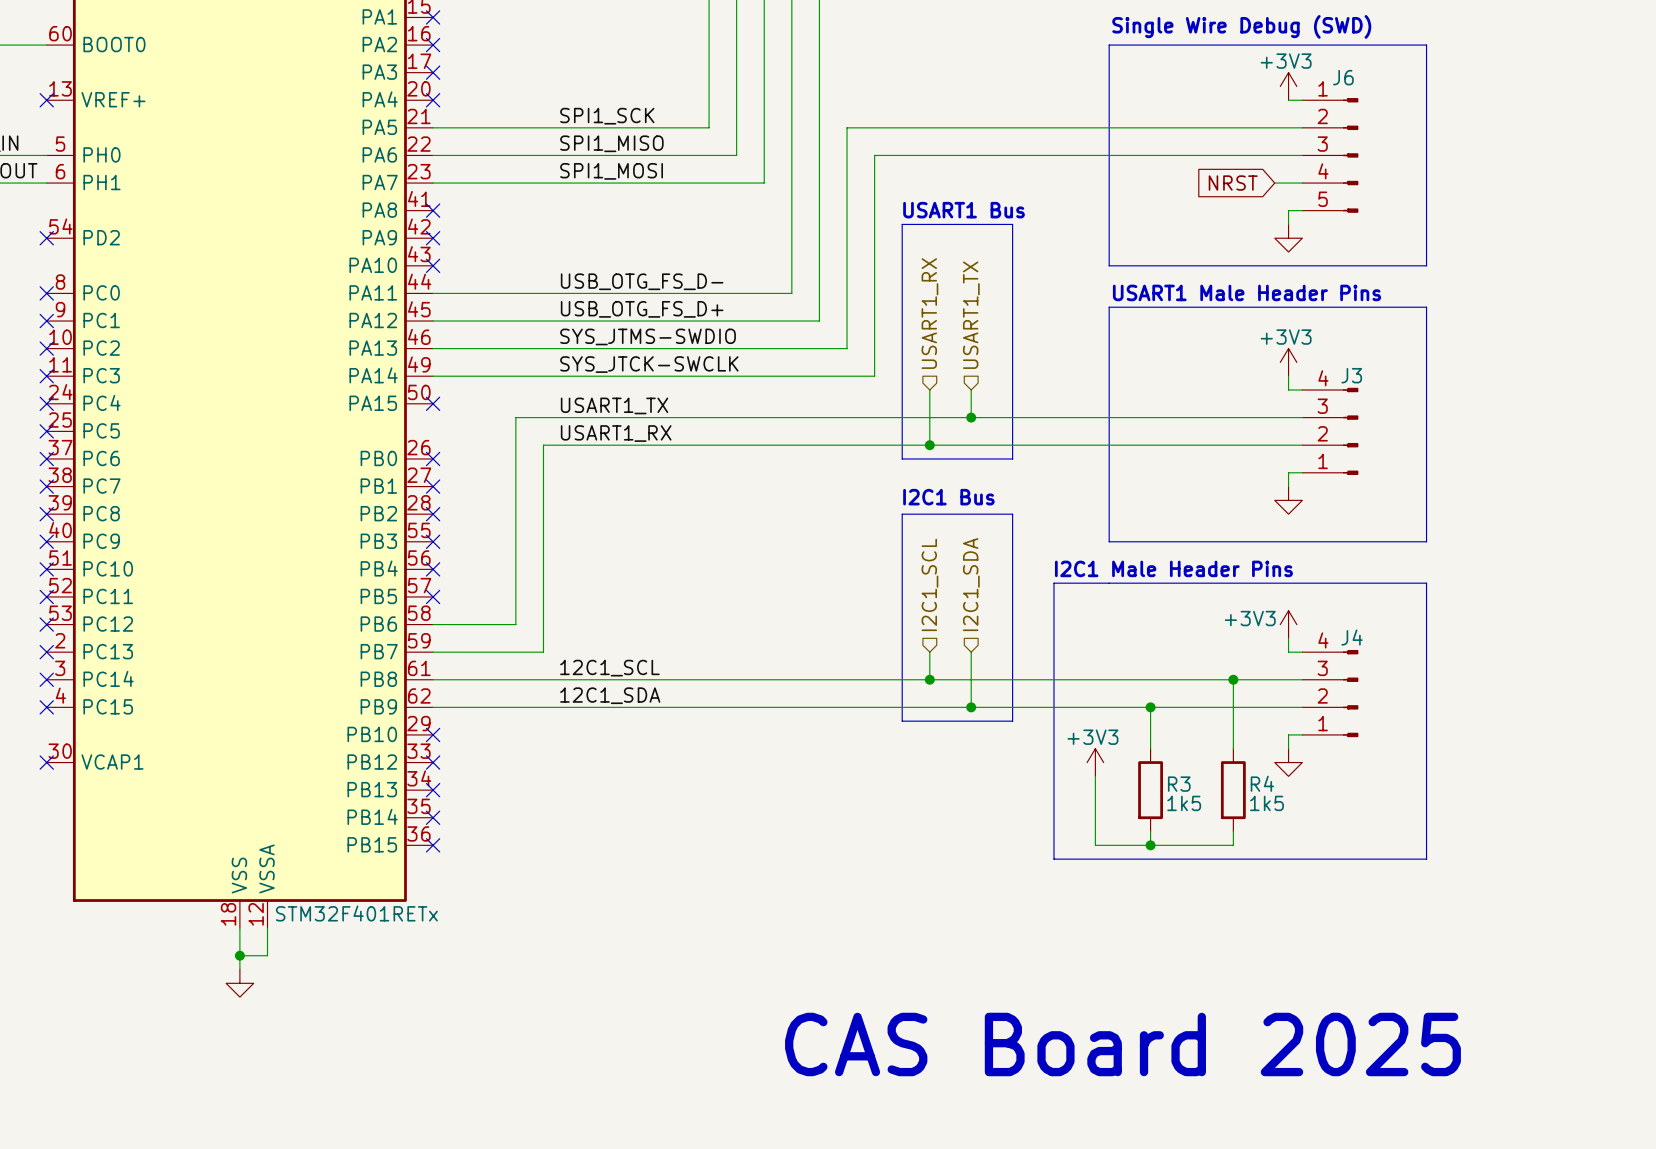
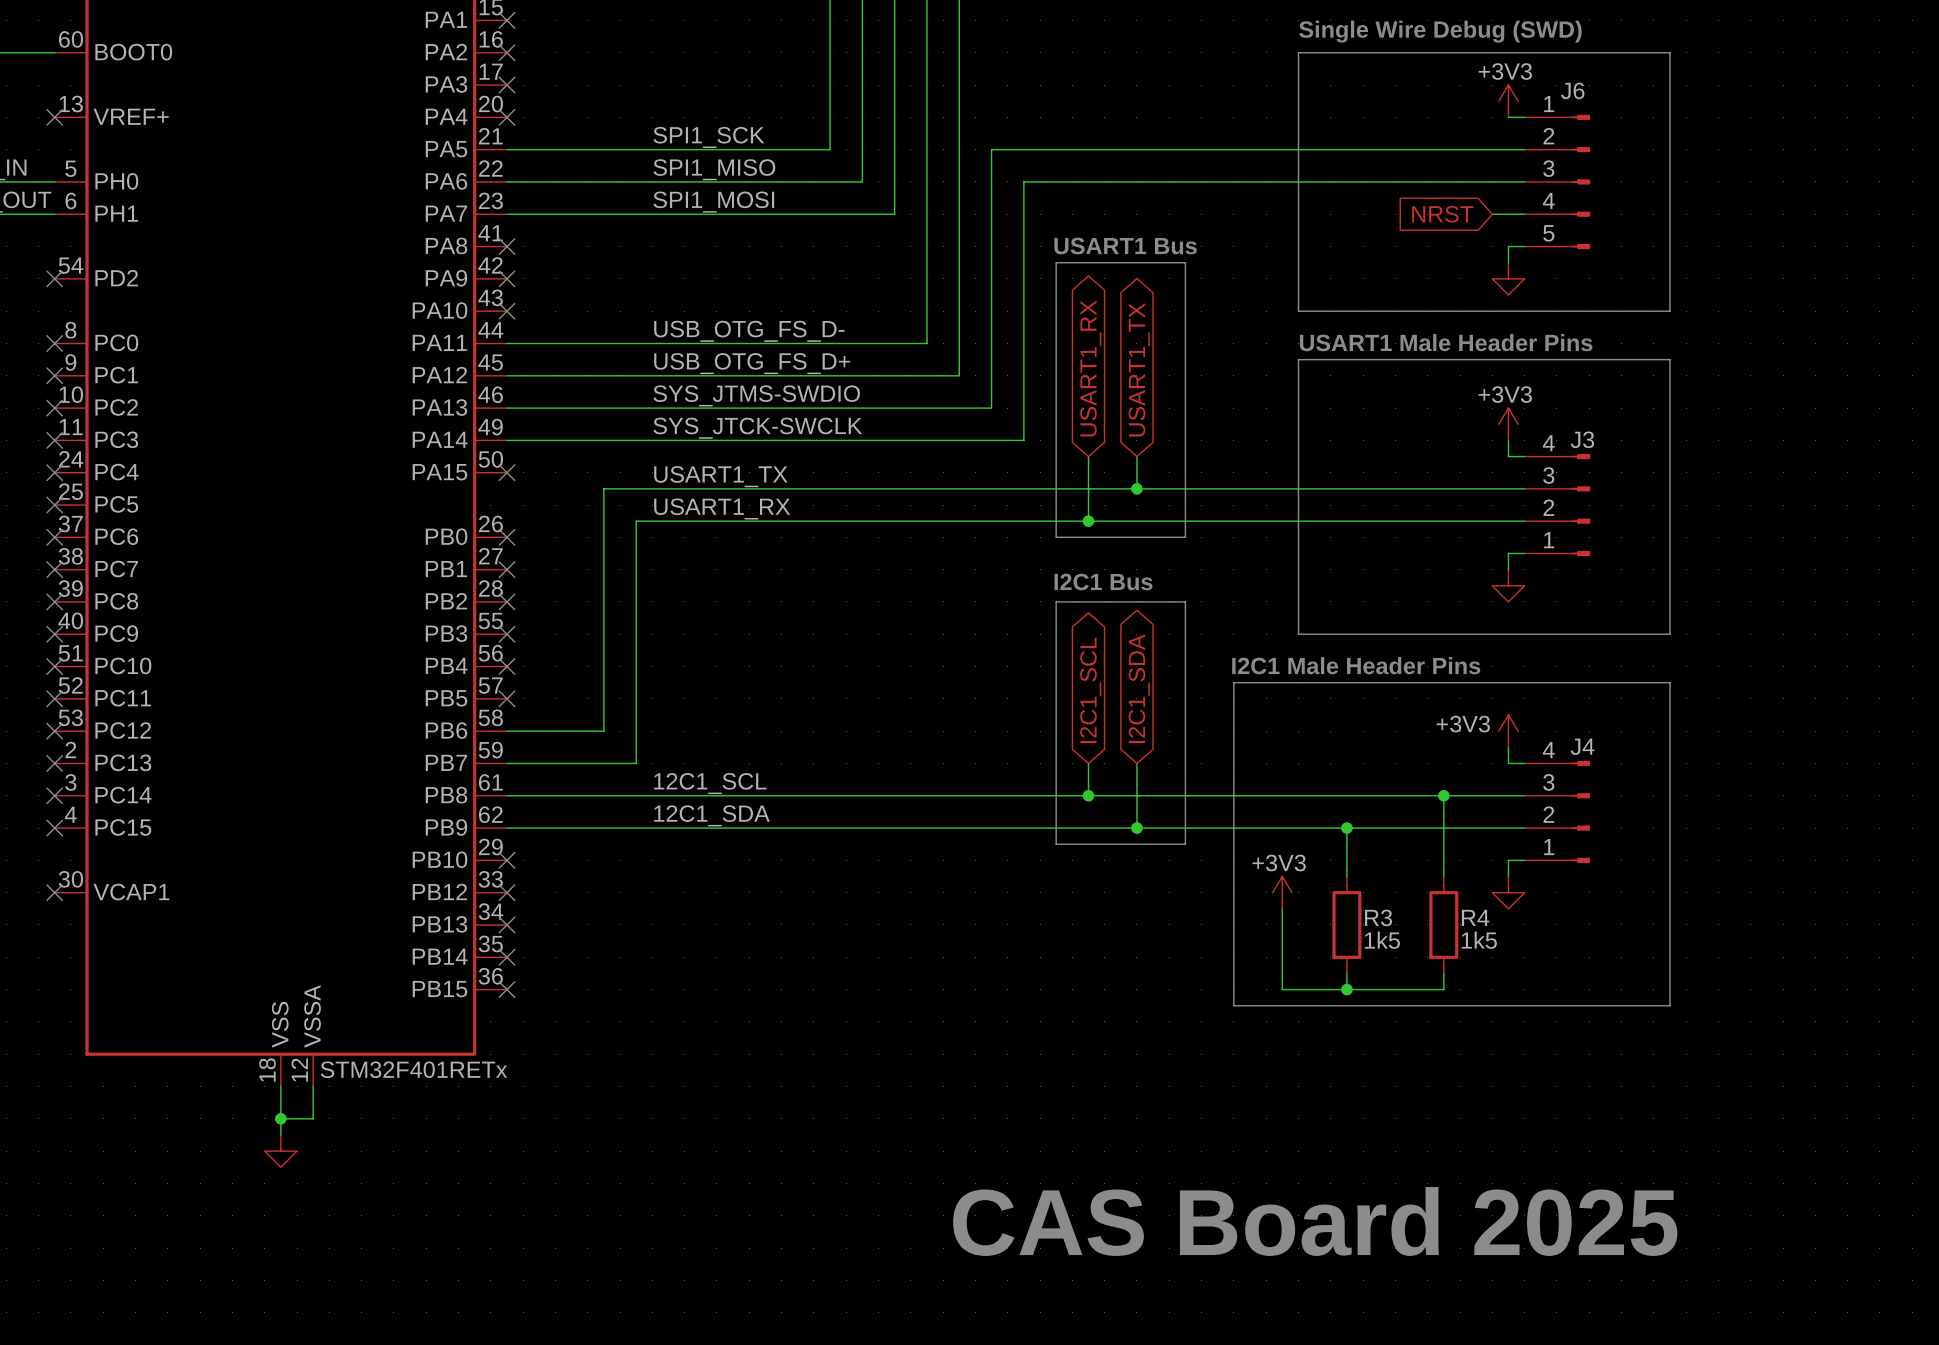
hierarchical label: USART1_RX (929, 313) -> none
global label: none -> USART1_RX (1090, 368)
hierarchical label: USART1_TX (971, 315) -> none
global label: none -> USART1_TX (1139, 369)
hierarchical label: I2C1_SCL (929, 584) -> none
hierarchical label: I2C1_SDA (971, 584) -> none
global label: none -> I2C1_SCL (1090, 690)
global label: none -> I2C1_SDA (1139, 688)

